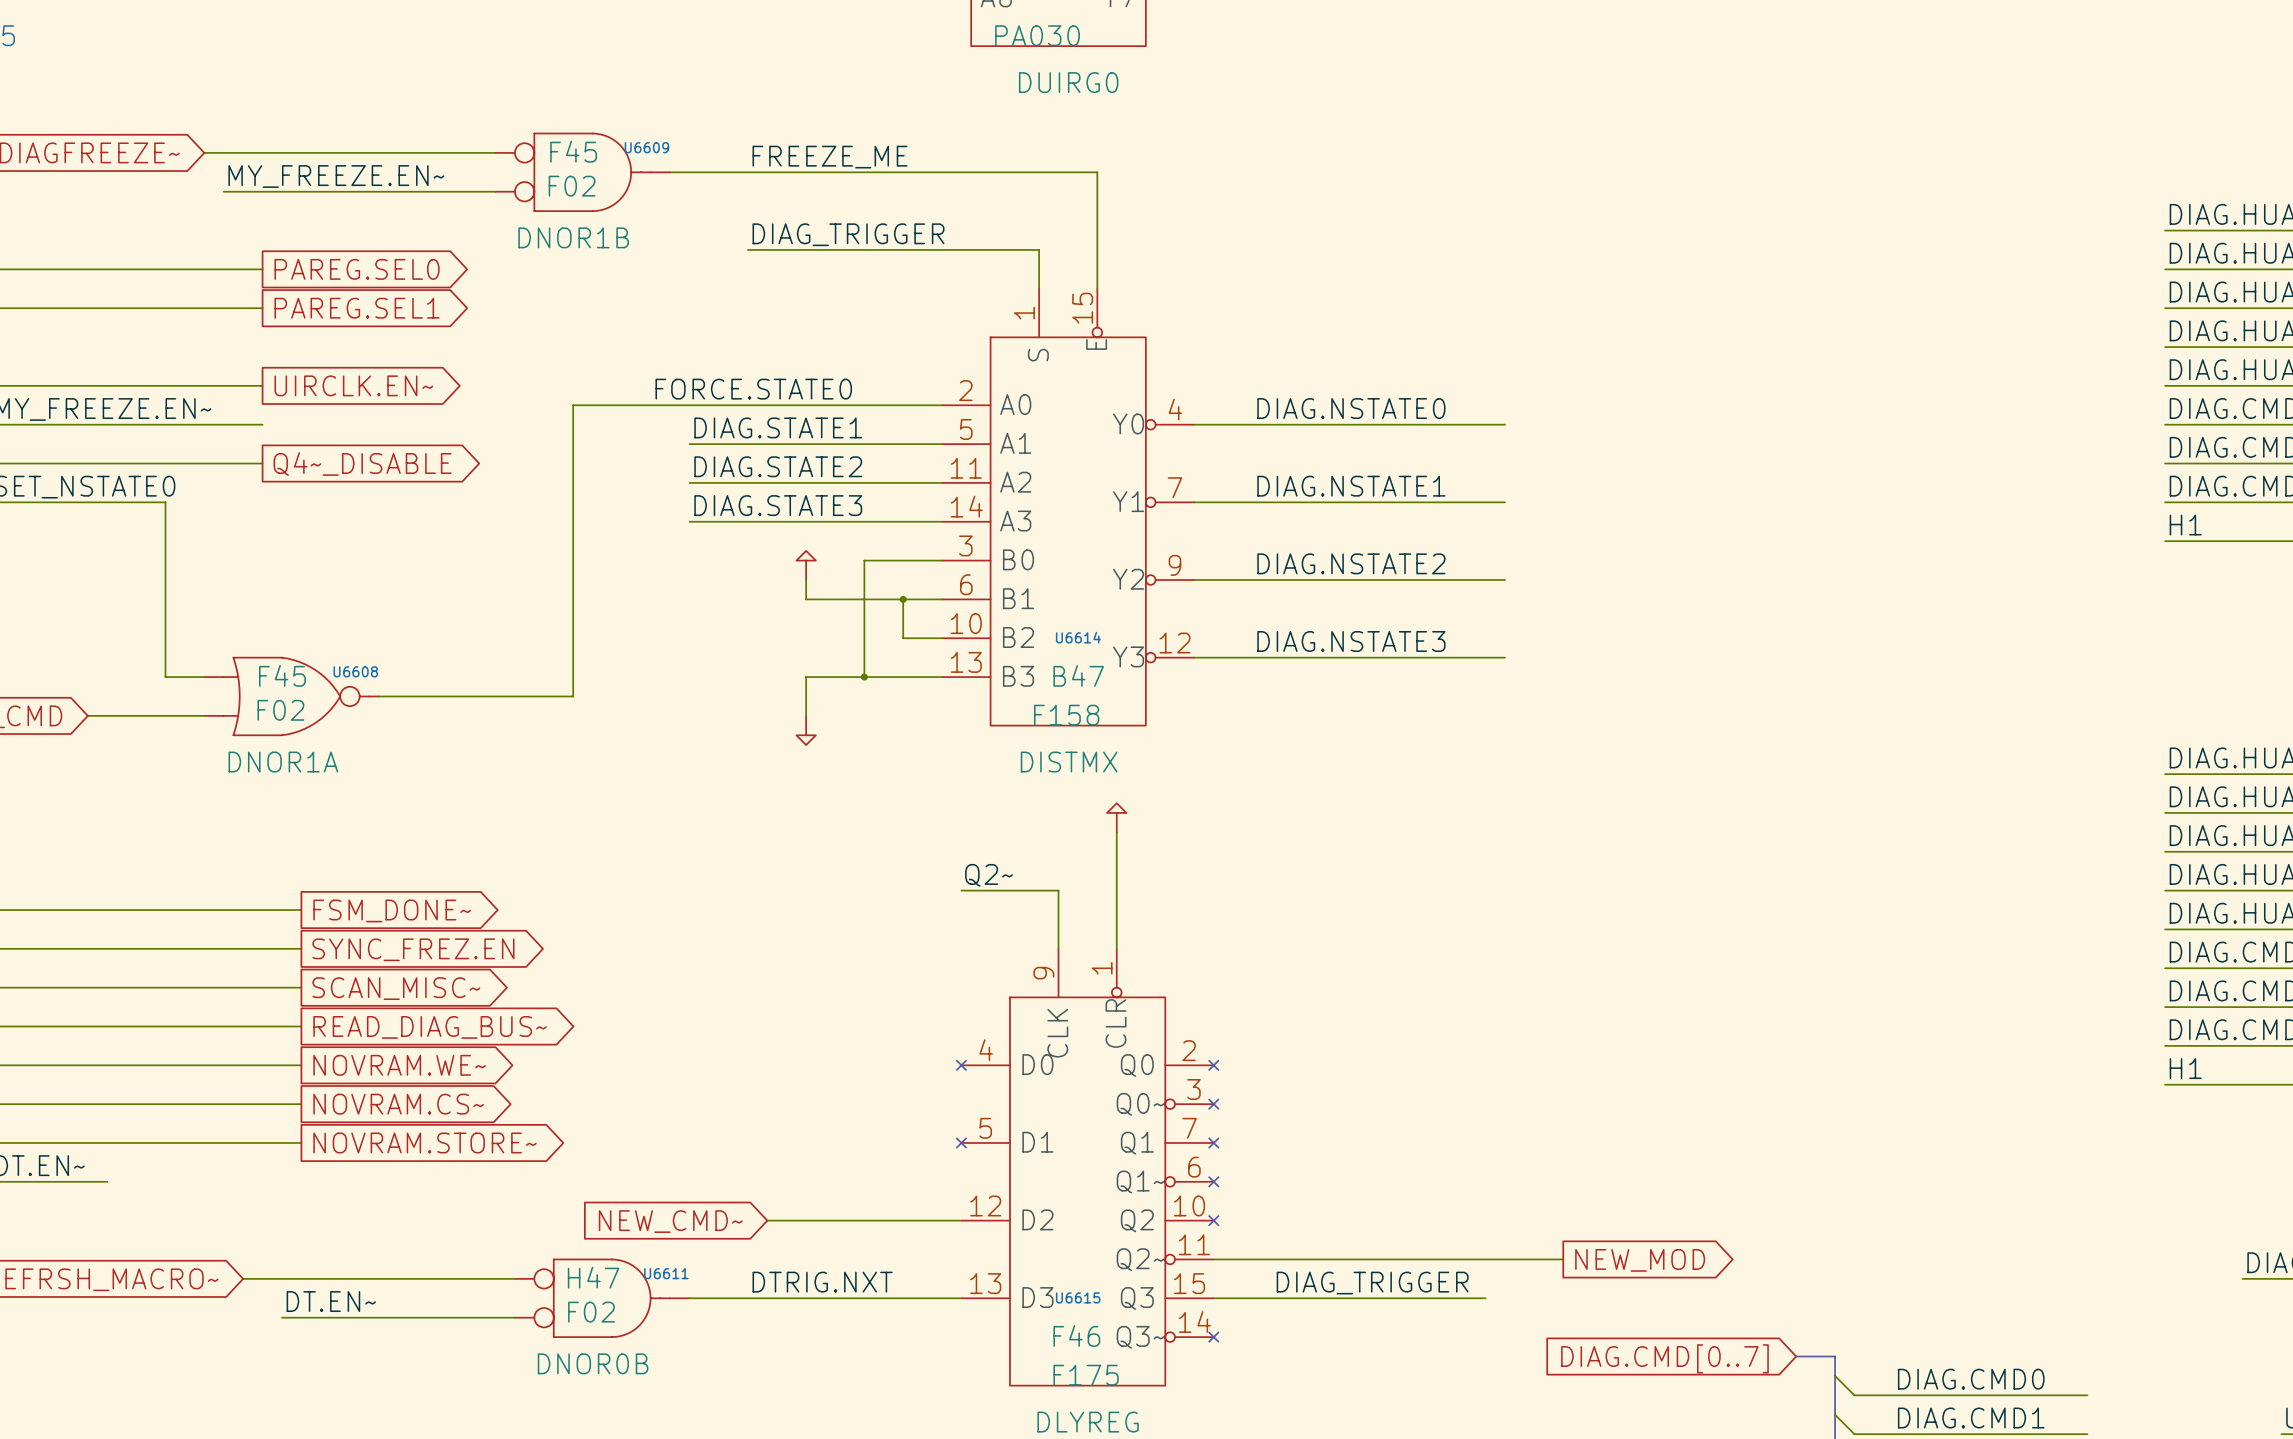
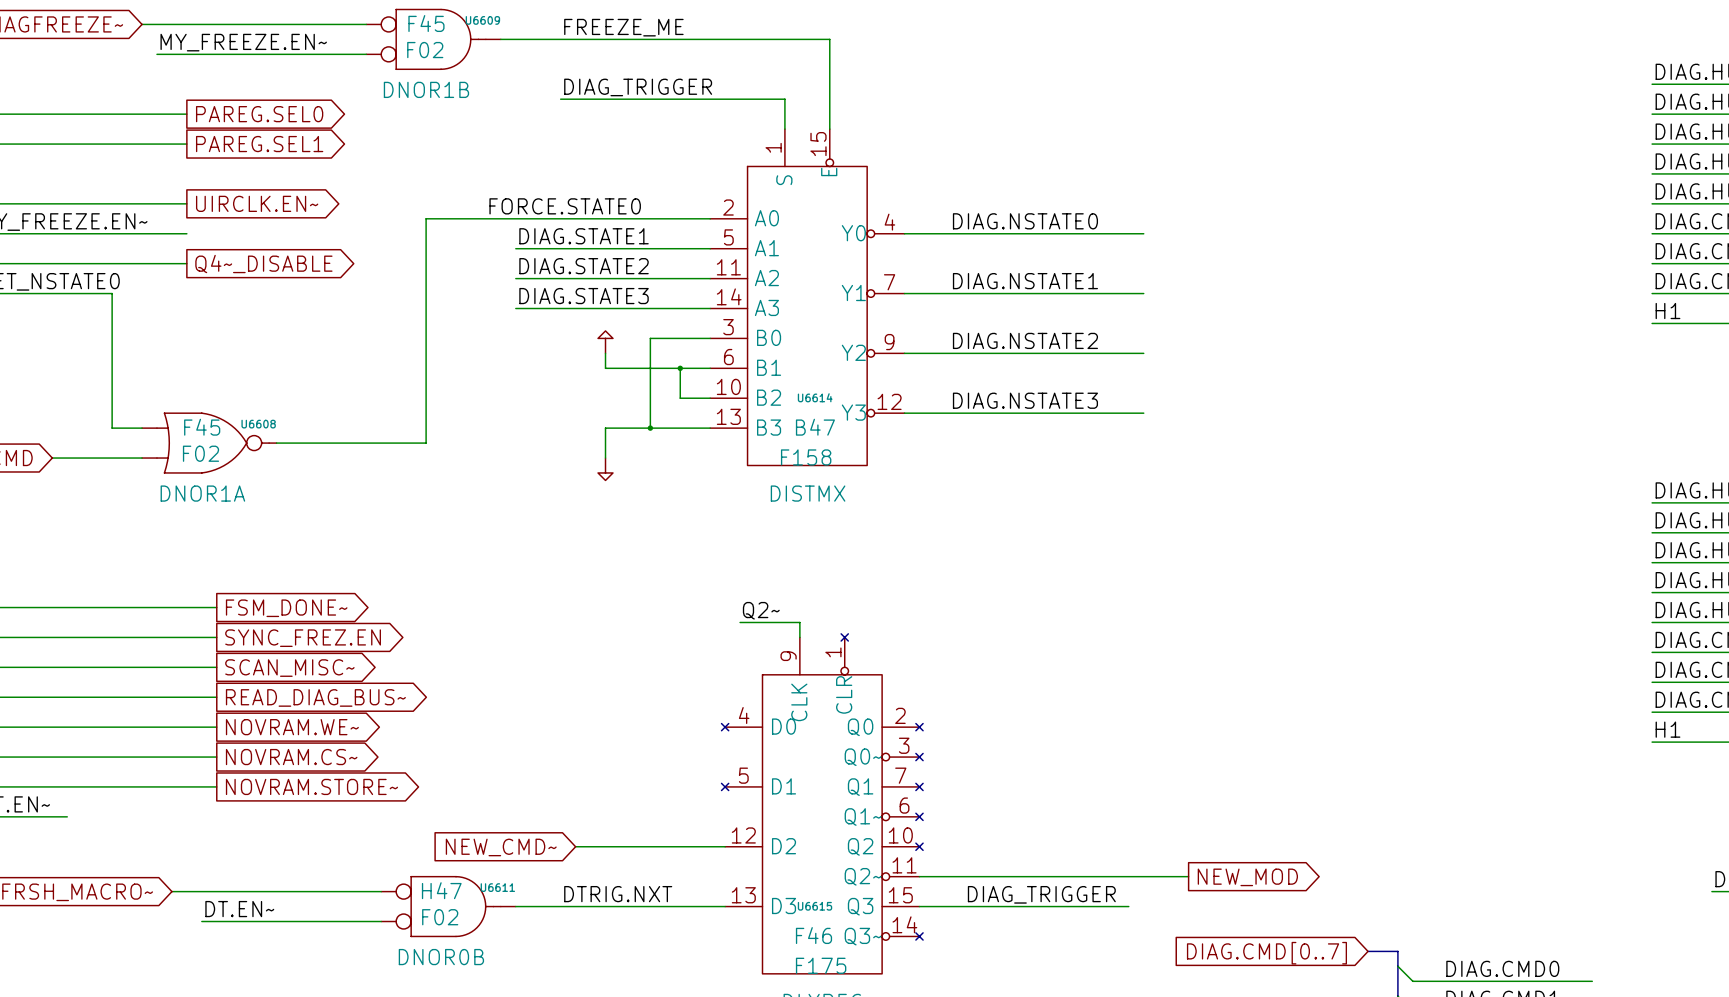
power symbol: (1116, 817) -> none
wire: (1116, 832) (1116, 948) -> none
label position: Q2~ (989, 875) -> Q2~ (761, 610)
wire: (961, 890) (1058, 890) (1058, 929) -> (740, 622) (799, 622)
no-connect mark: none -> (844, 637)

